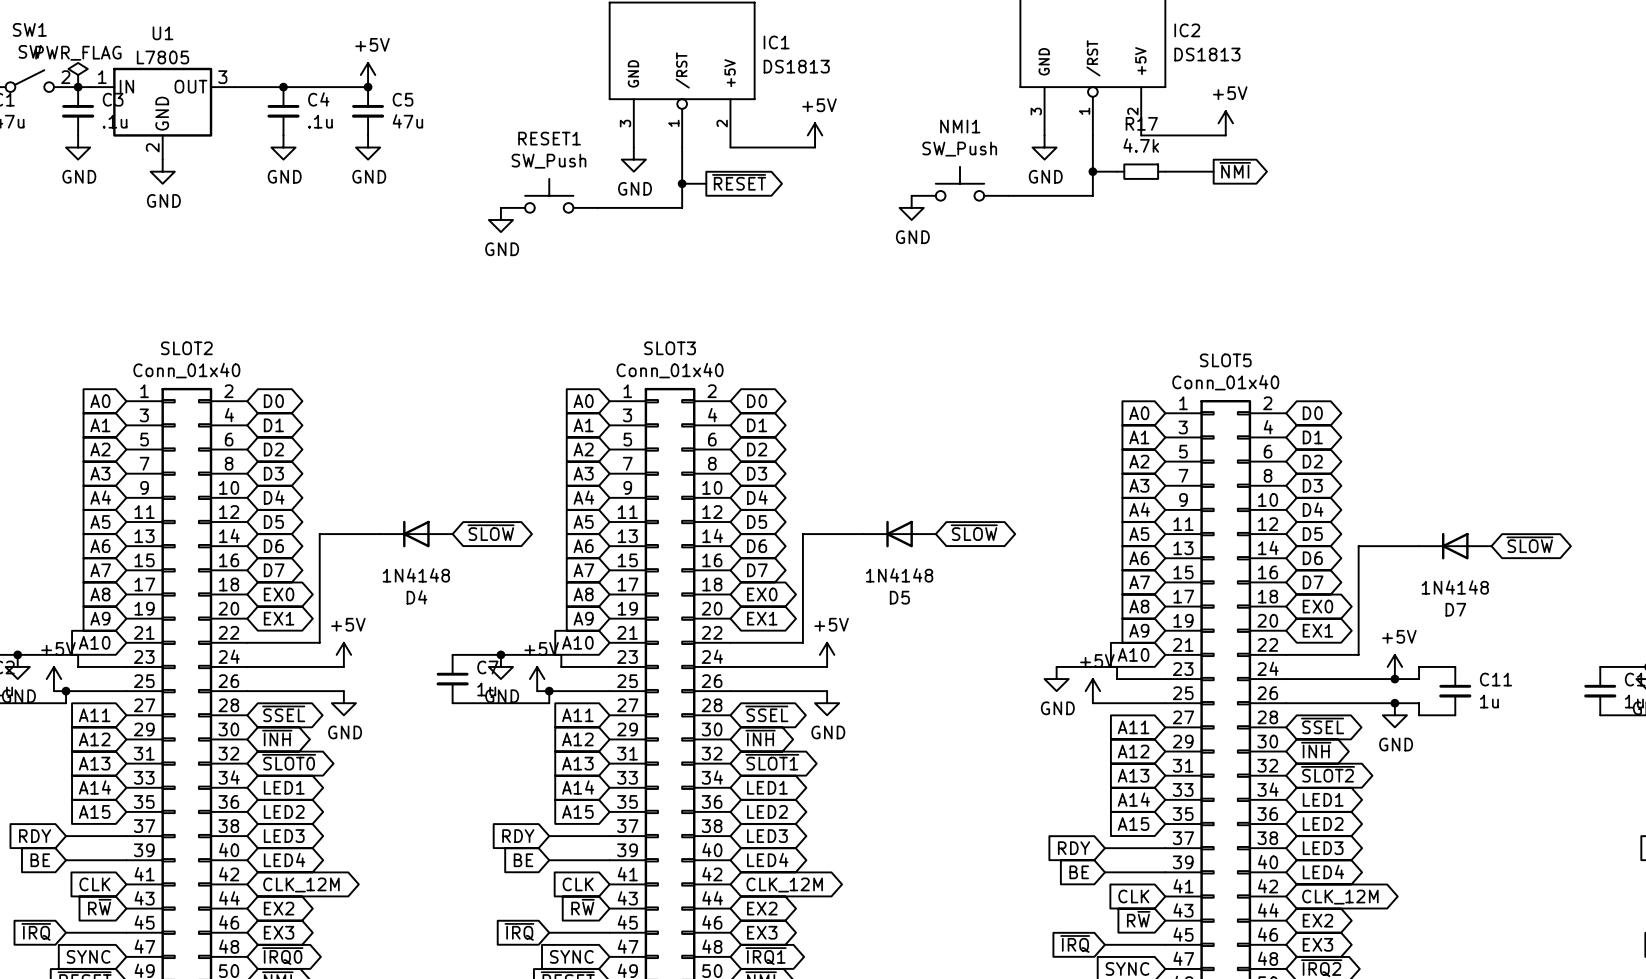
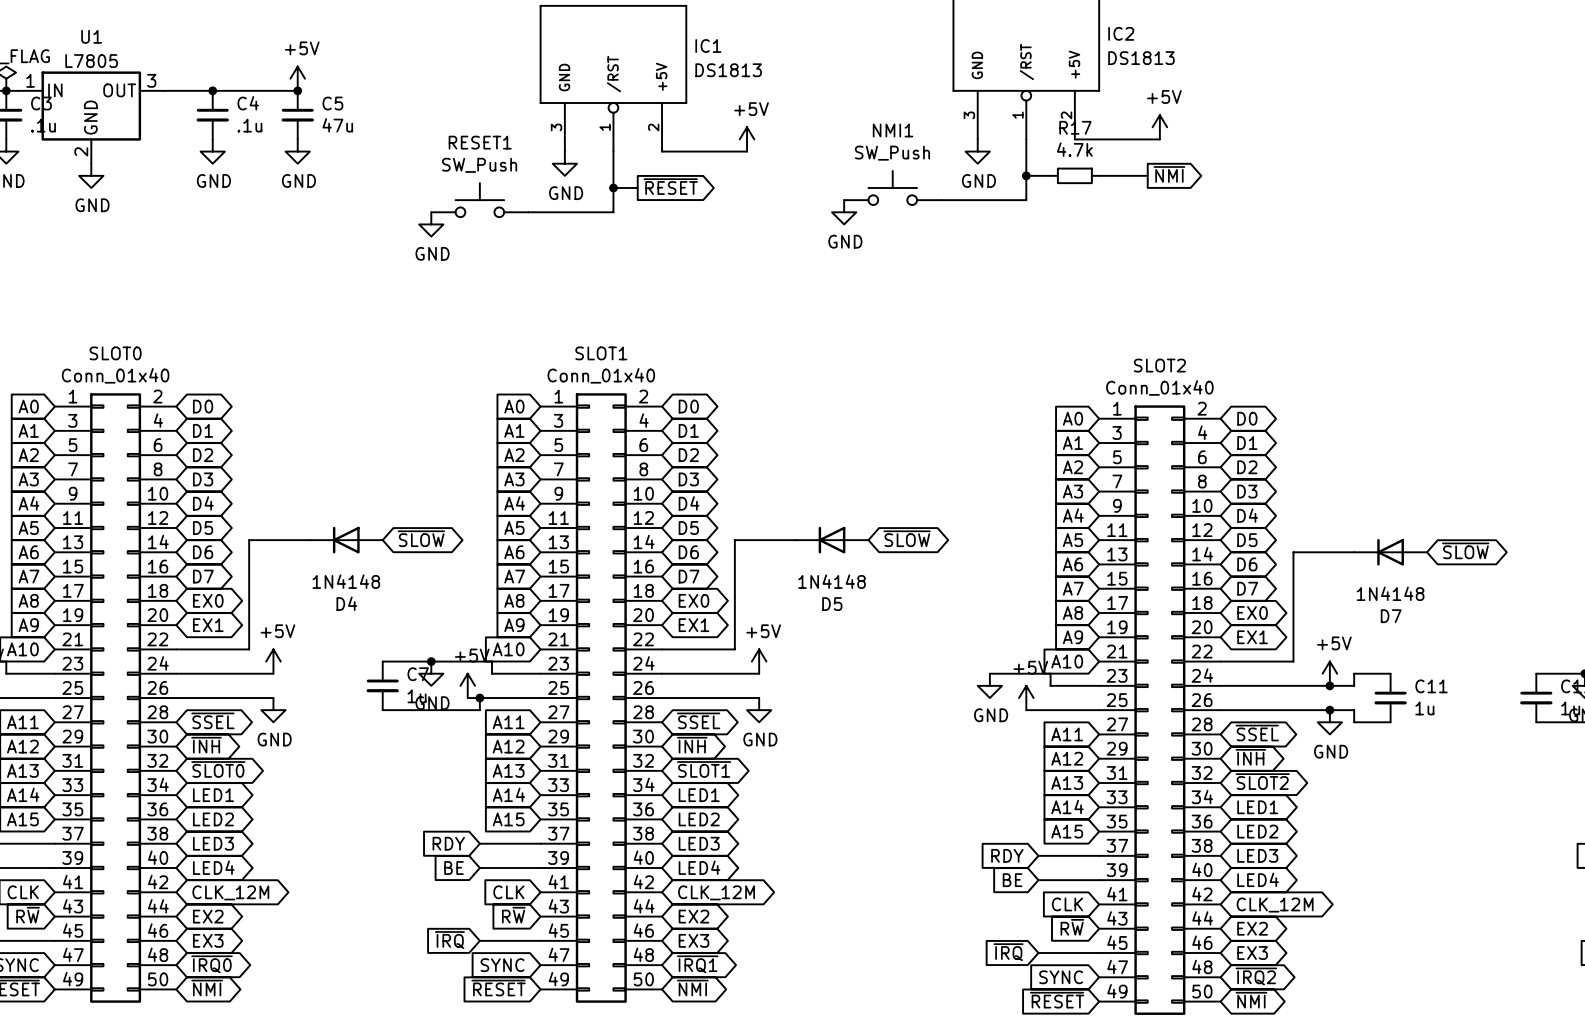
SLOT2 name: SLOT2 (186, 348) -> SLOT0 (115, 353)
SLOT3 name: SLOT3 (670, 348) -> SLOT1 (601, 353)
SLOT5 name: SLOT5 (1225, 360) -> SLOT2 (1159, 365)

